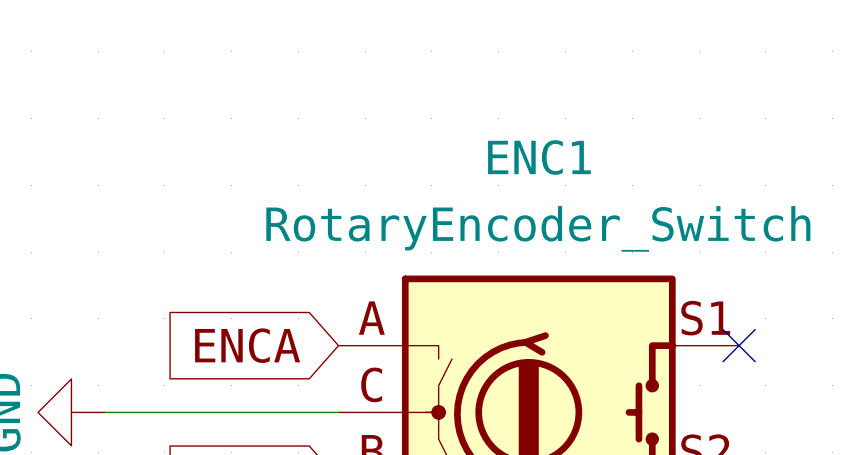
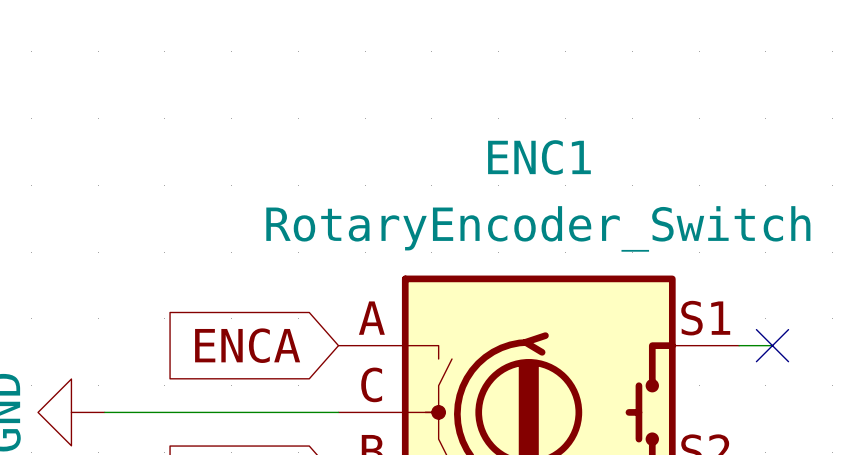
wire: none -> (739, 345) (772, 345)
no-connect mark position: (739, 345) -> (772, 345)

